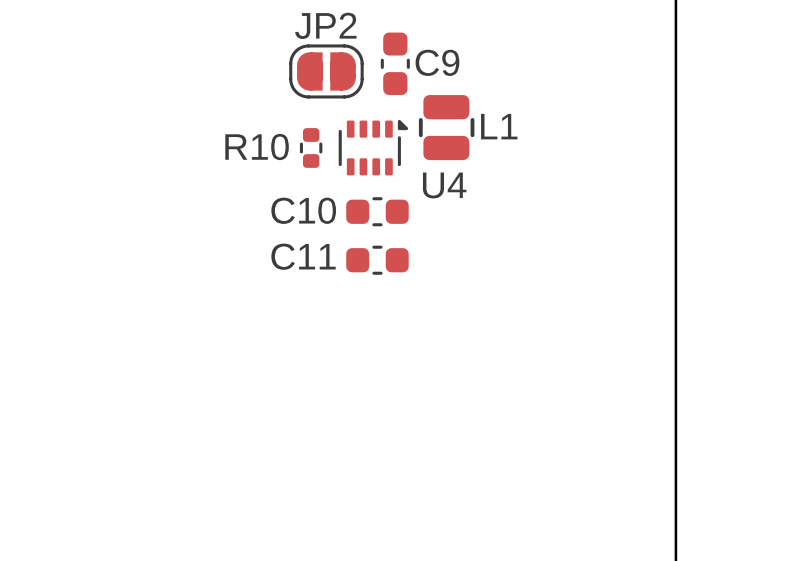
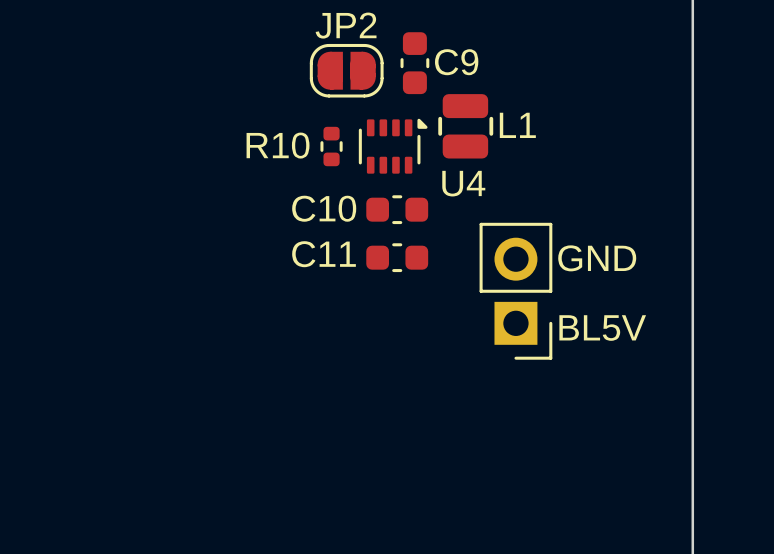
text: none -> GND (597, 258)
part: none -> (515, 291)
text: none -> BL5V (602, 328)

